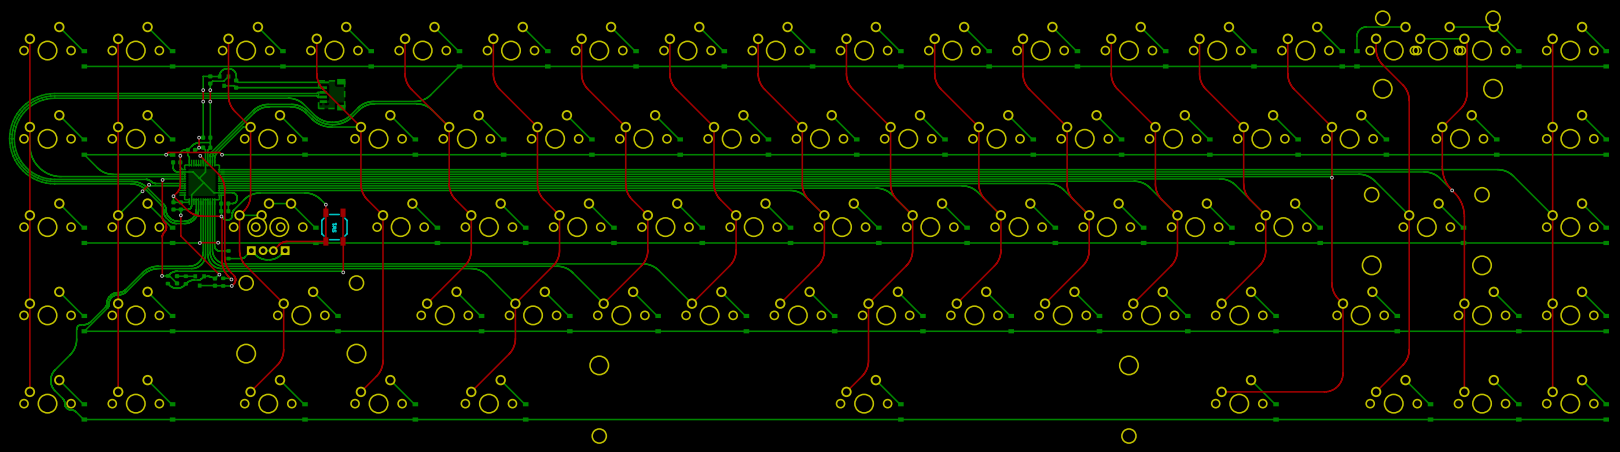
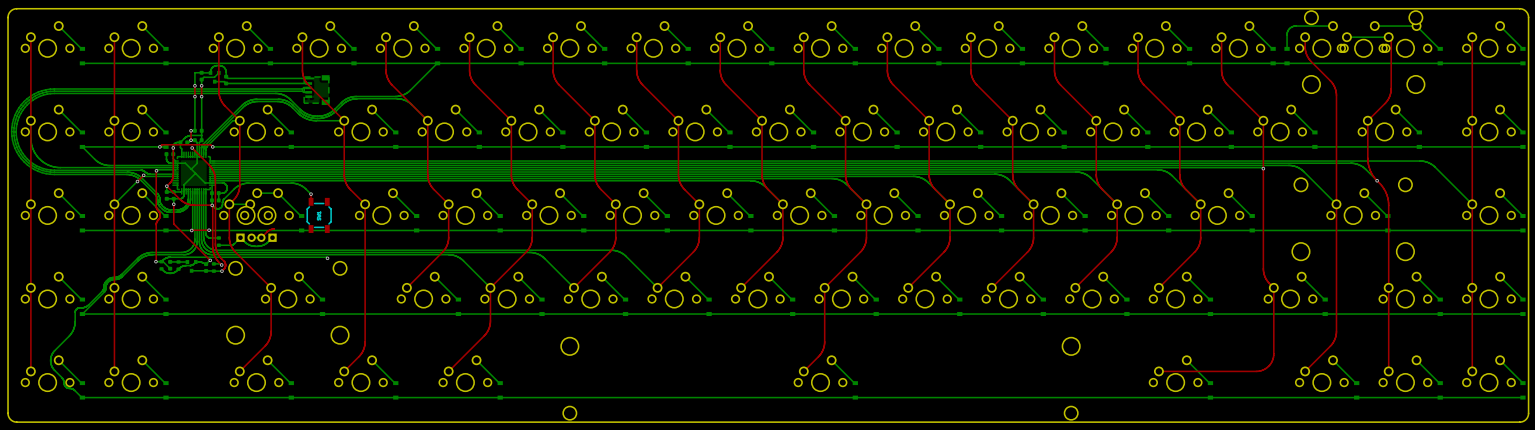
board edge: none -> (16, 8) (1522, 9) (1526, 12) (1528, 17) (1528, 415) (1525, 420) (1519, 422) (14, 421) (9, 418) (8, 413) (8, 17) (10, 11) (16, 8)
top track: (325, 212) (325, 241) (287, 241) -> none
top track: (343, 212) (343, 241) -> none
top track: (343, 241) (343, 272) -> none

